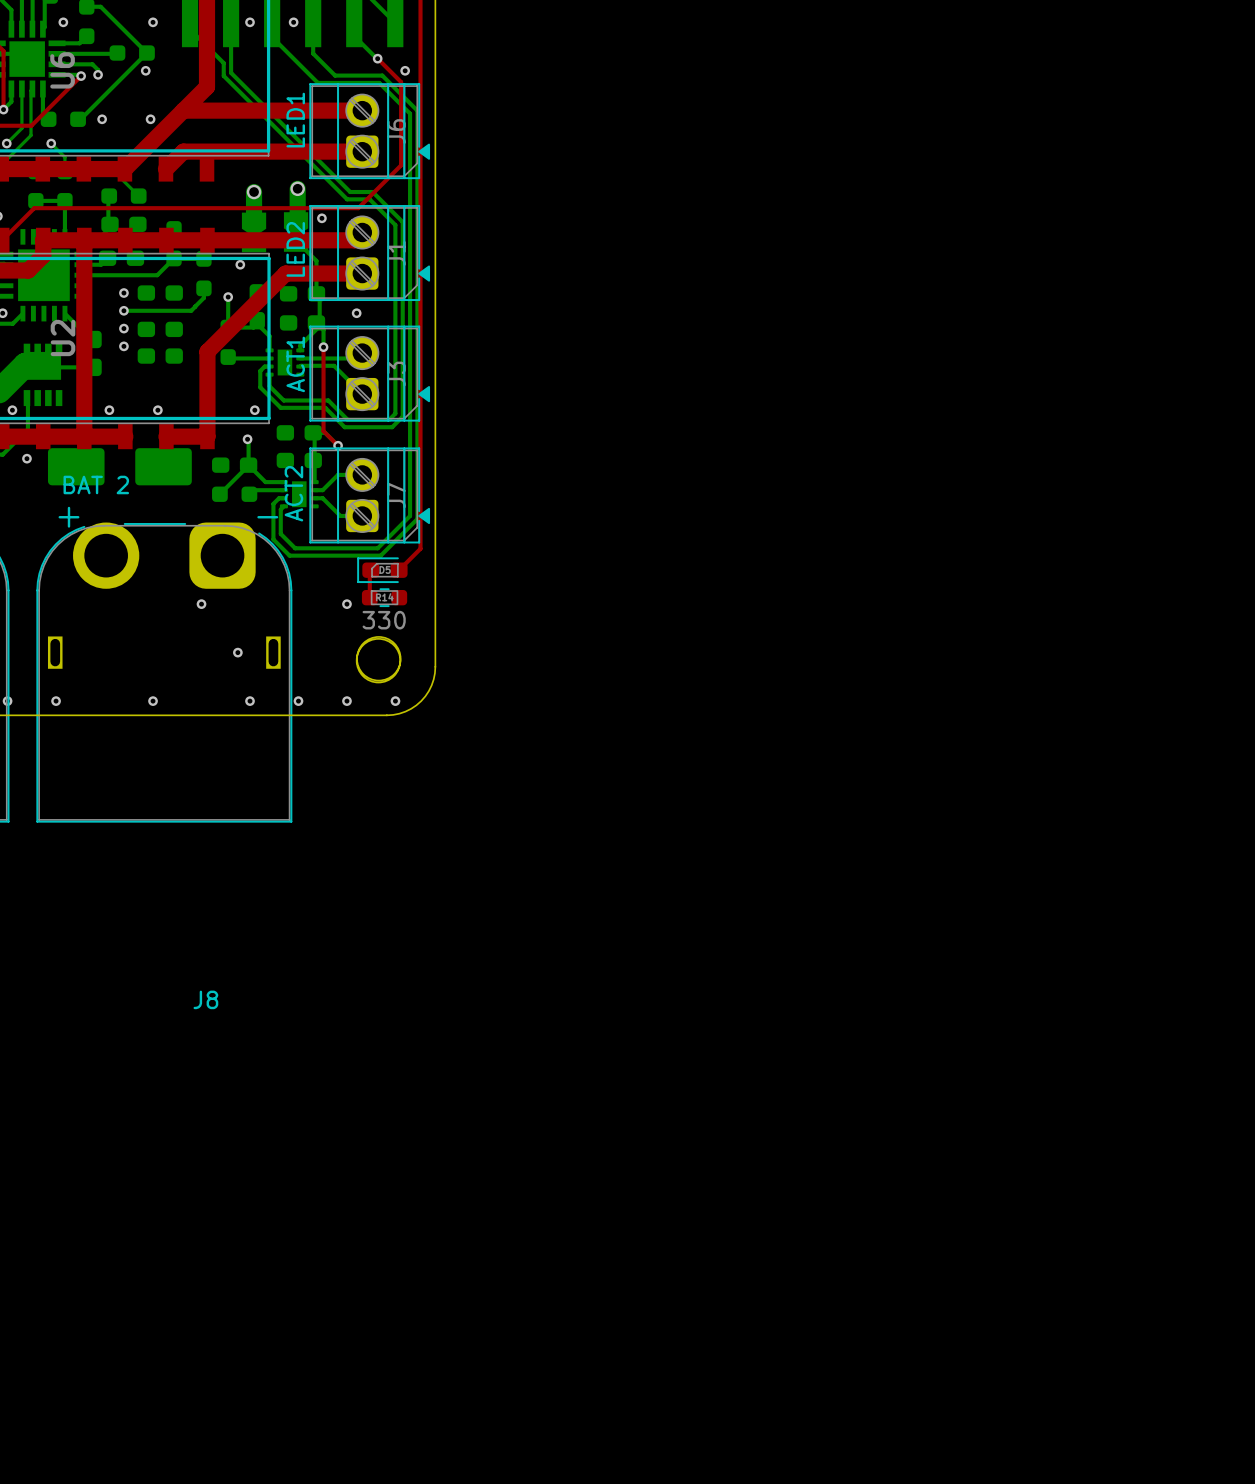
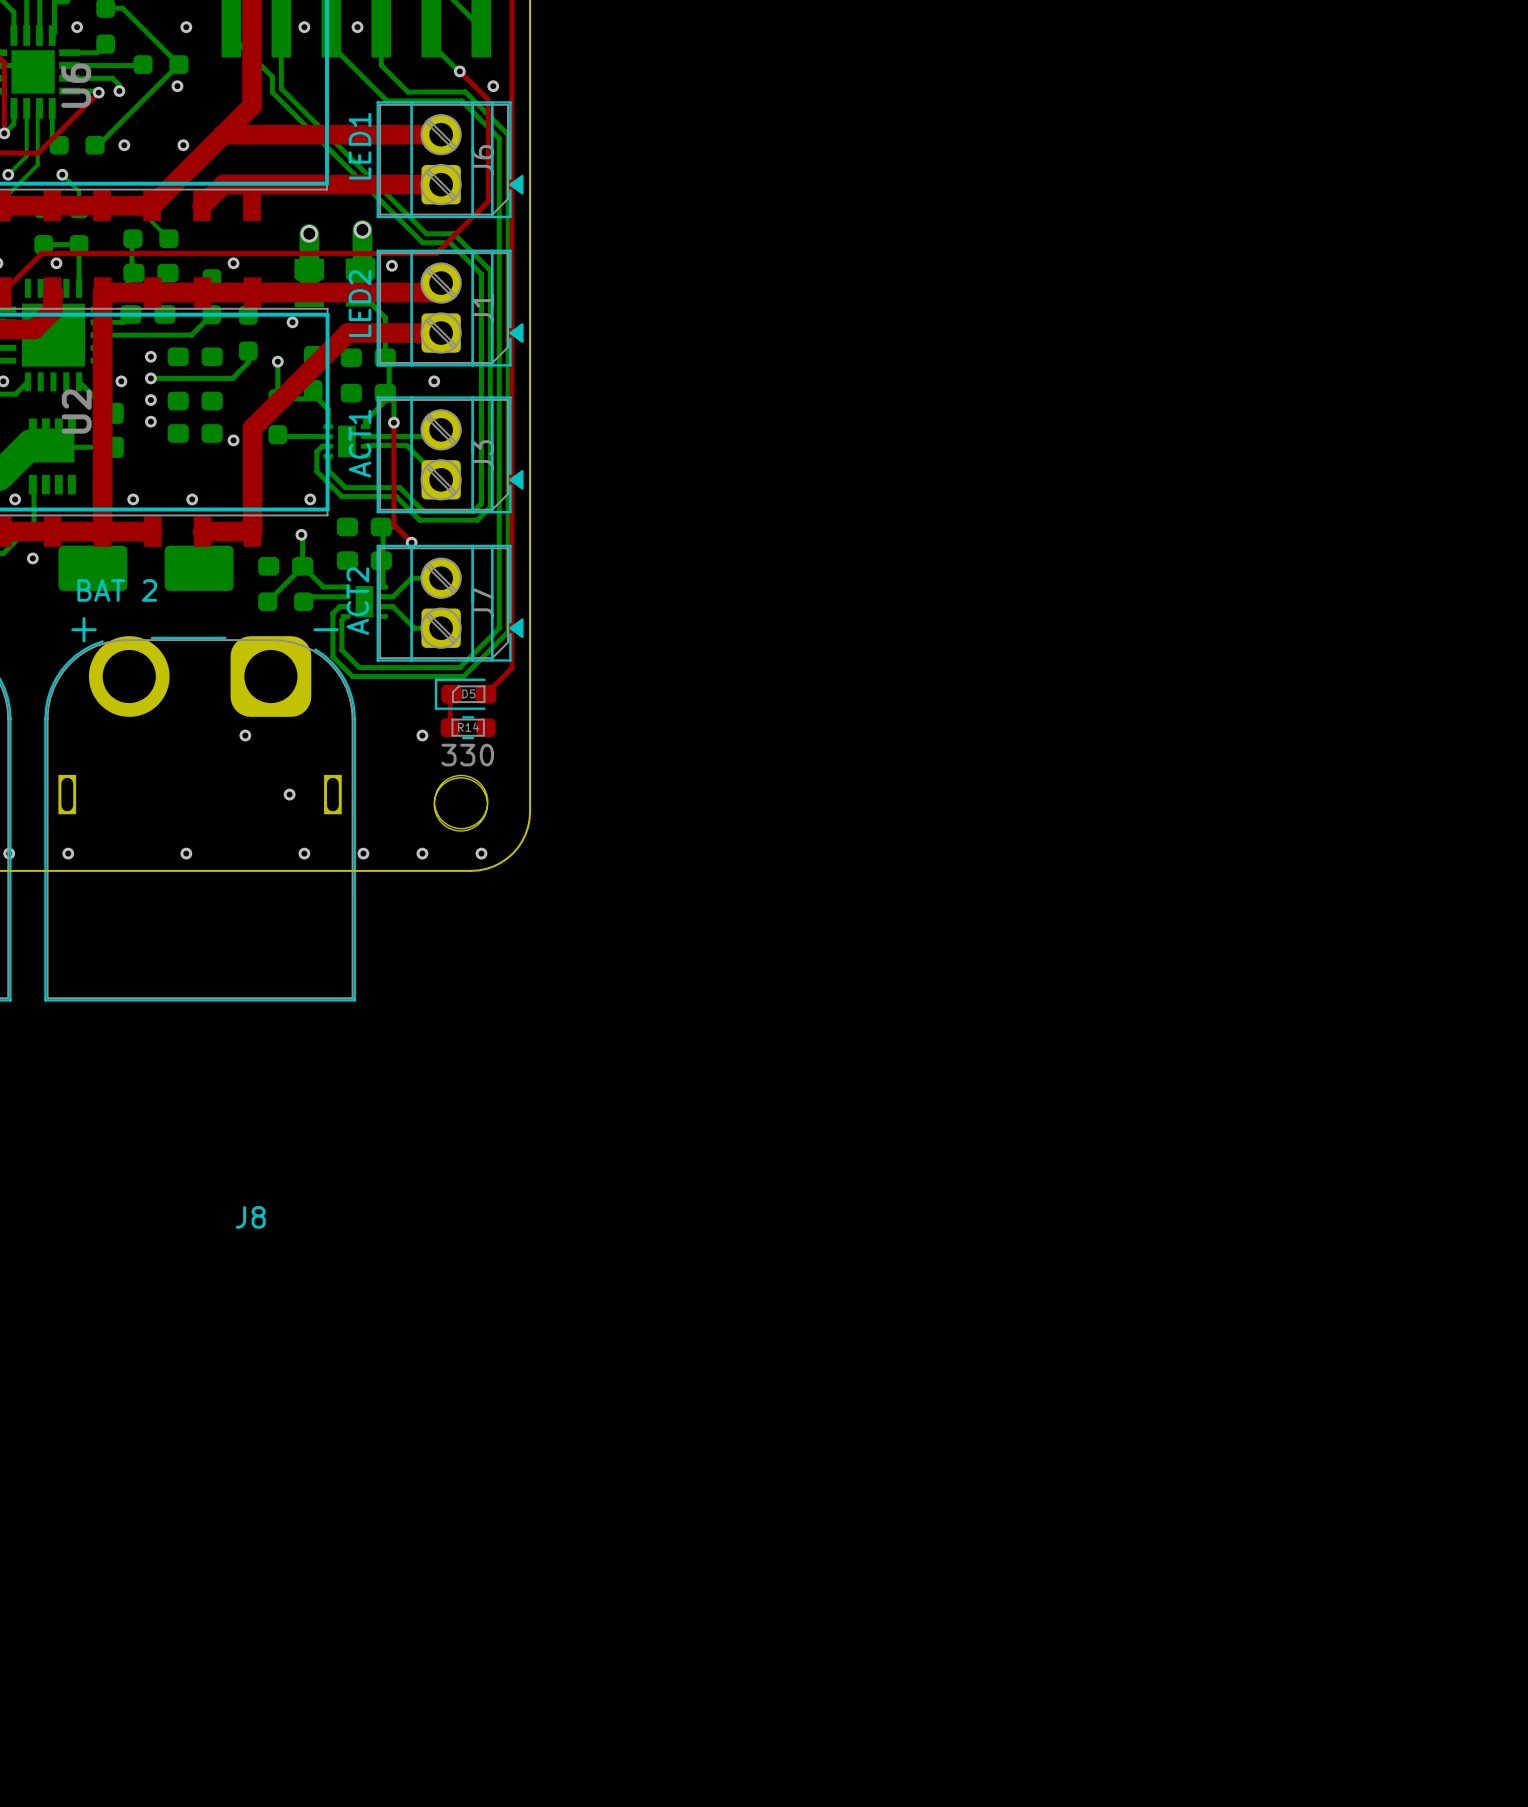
via: none -> (56, 263)
via: none -> (233, 263)
top track: (43, 240) (84, 240) -> none
via: none -> (121, 381)
via: none -> (233, 440)

